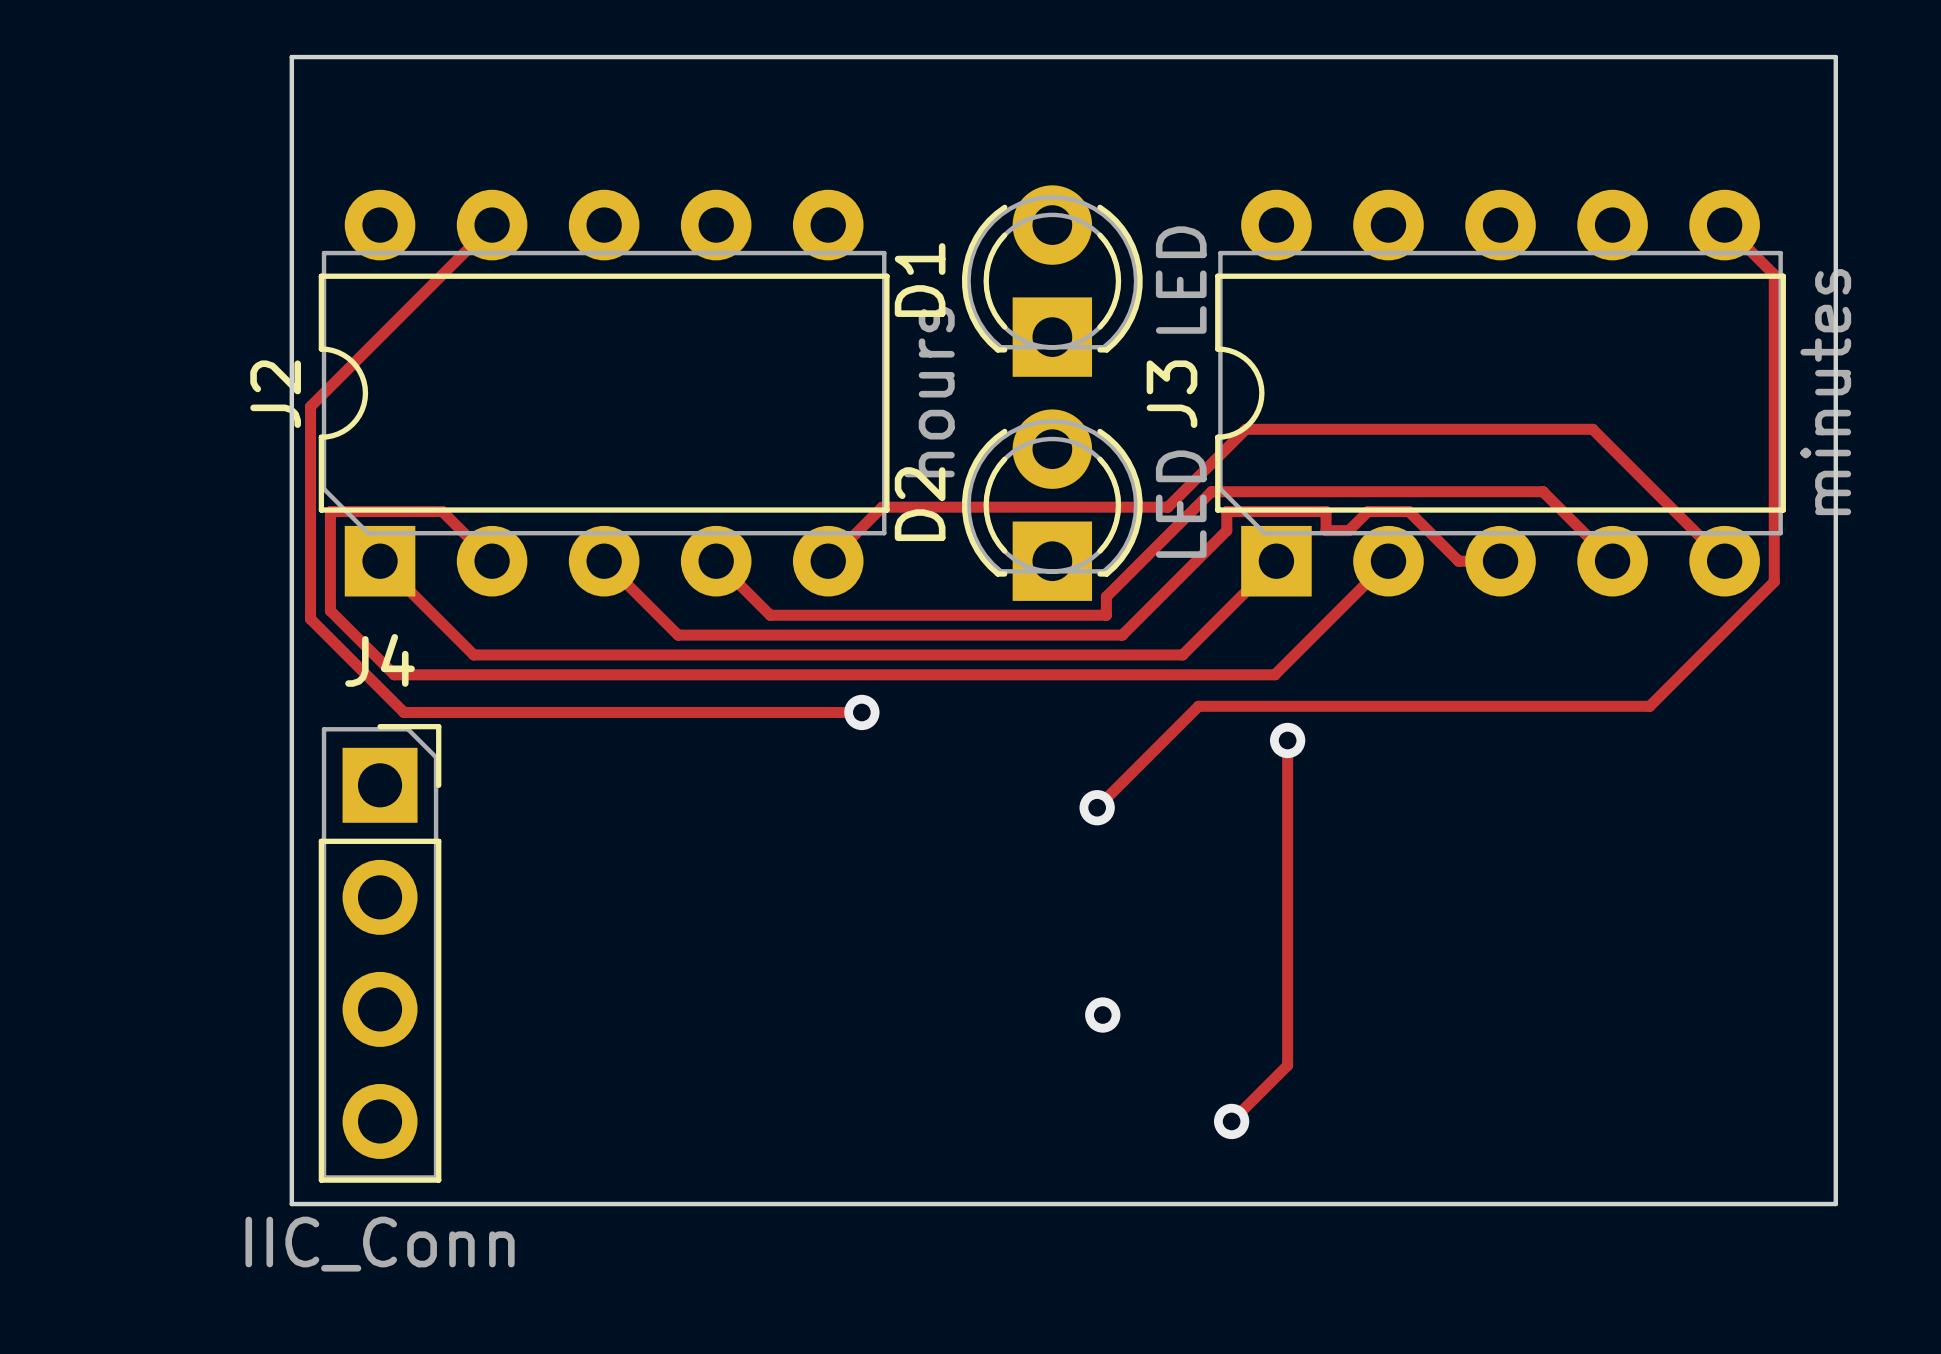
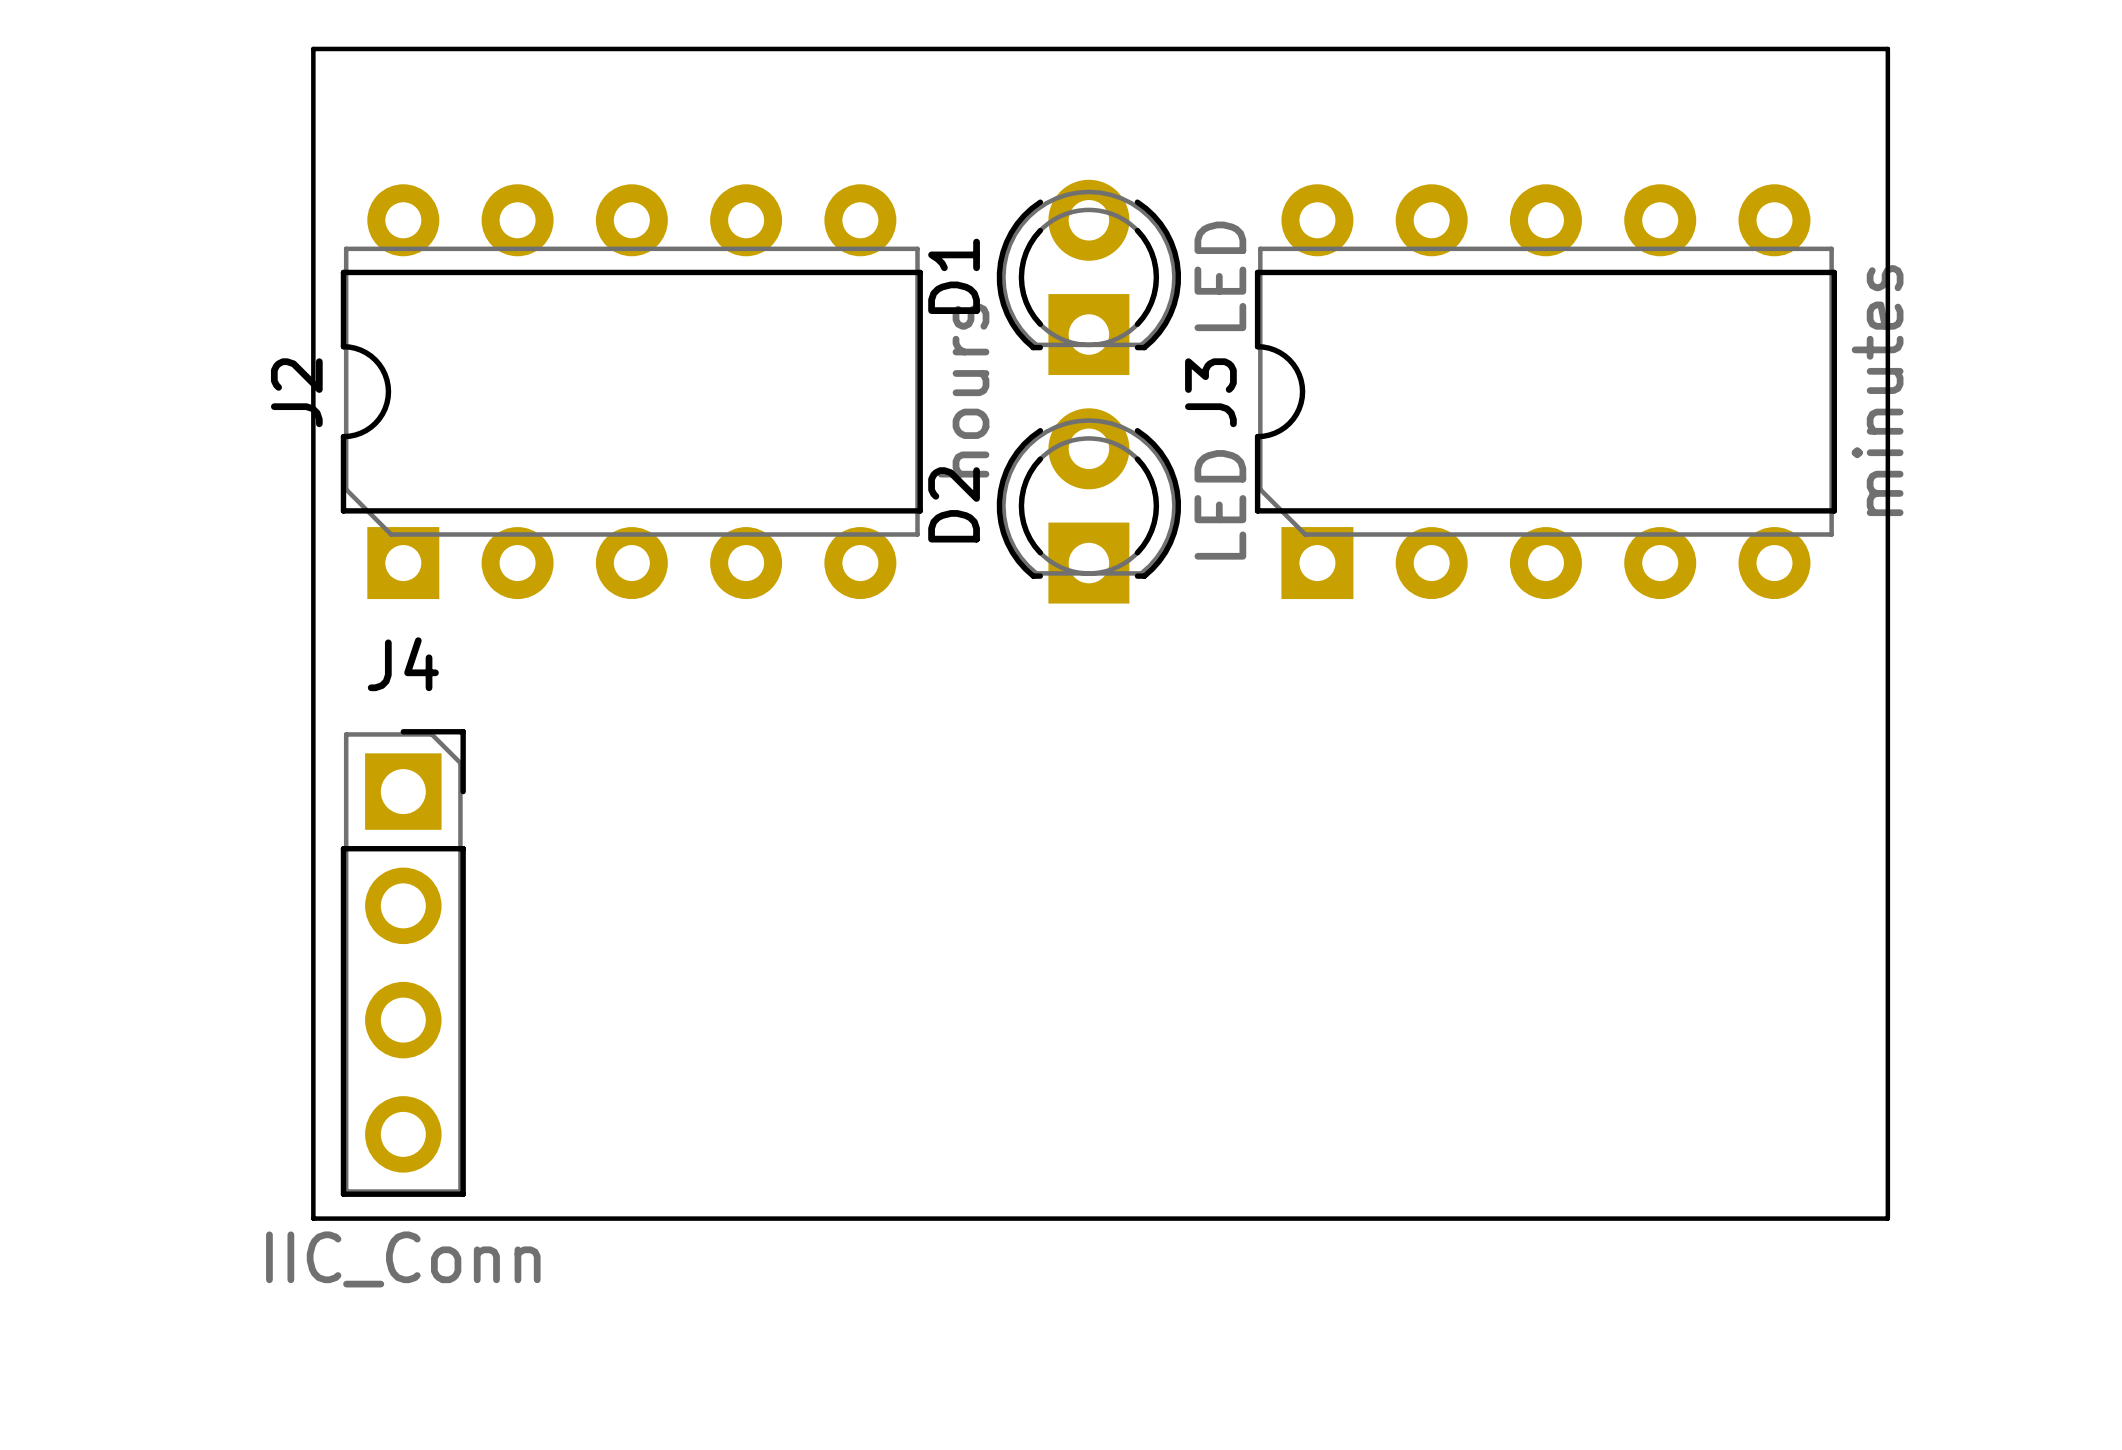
track: (492, 225) (310, 406) (310, 619) (403, 712) (861, 712) -> none
track: (1724, 225) (1774, 274) (1774, 581) (1649, 706) (1198, 706) (1097, 807) -> none
track: (380, 561) (473, 654) (1182, 654) (1276, 561) -> none
track: (492, 561) (442, 511) (330, 511) (330, 610) (394, 674) (1274, 674) (1388, 561) -> none
track: (604, 561) (678, 635) (1122, 635) (1226, 530) (1226, 511) (1326, 511) (1326, 530) (1348, 530) (1367, 511) (1409, 511) (1458, 561) (1500, 561) -> none
track: (716, 561) (770, 615) (1106, 615) (1106, 596) (1211, 491) (1543, 491) (1612, 561) -> none
track: (828, 561) (882, 507) (1167, 507) (1245, 429) (1592, 429) (1724, 561) -> none
via: (861, 712) -> none
track: (1287, 740) (1287, 1065) (1231, 1121) -> none
via: (1287, 740) -> none
via: (1097, 807) -> none
via: (1102, 1015) -> none
via: (1231, 1121) -> none

